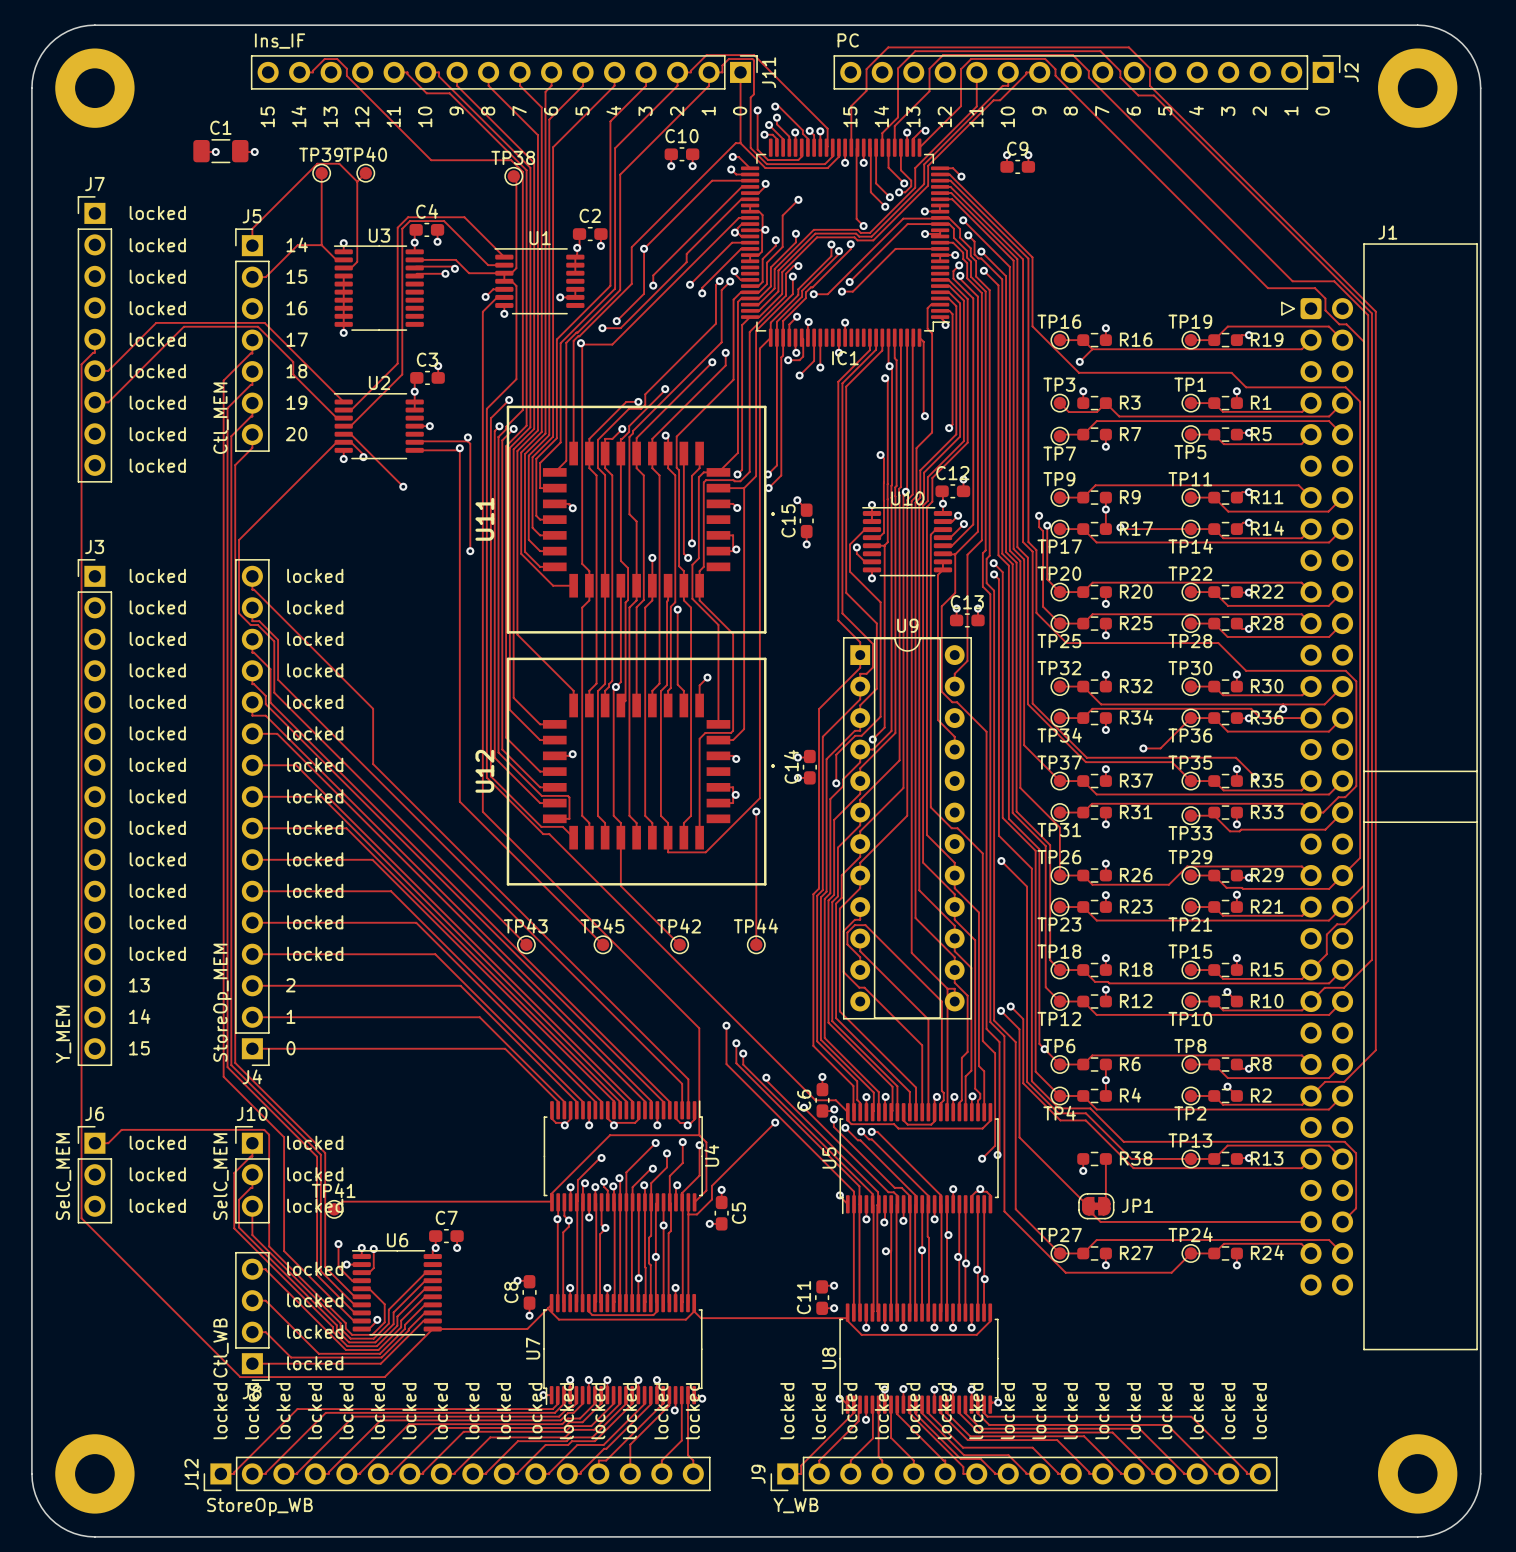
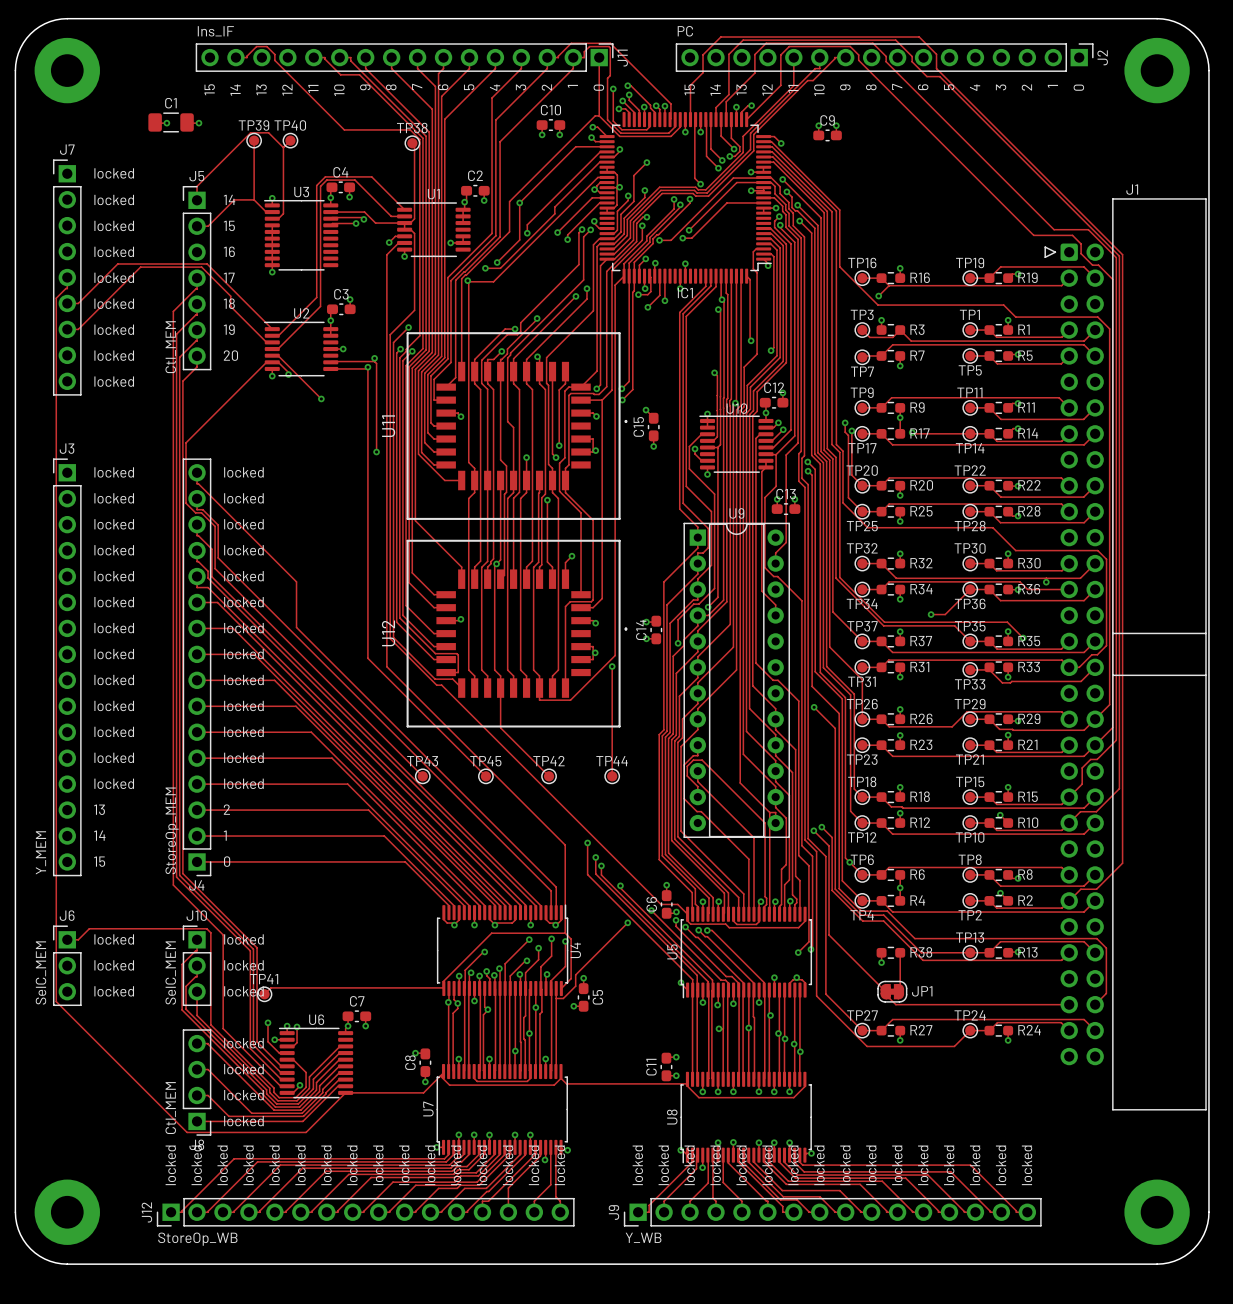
J8 value: Ctl_WB (221, 1347) -> Ctl_MEM (170, 1108)

